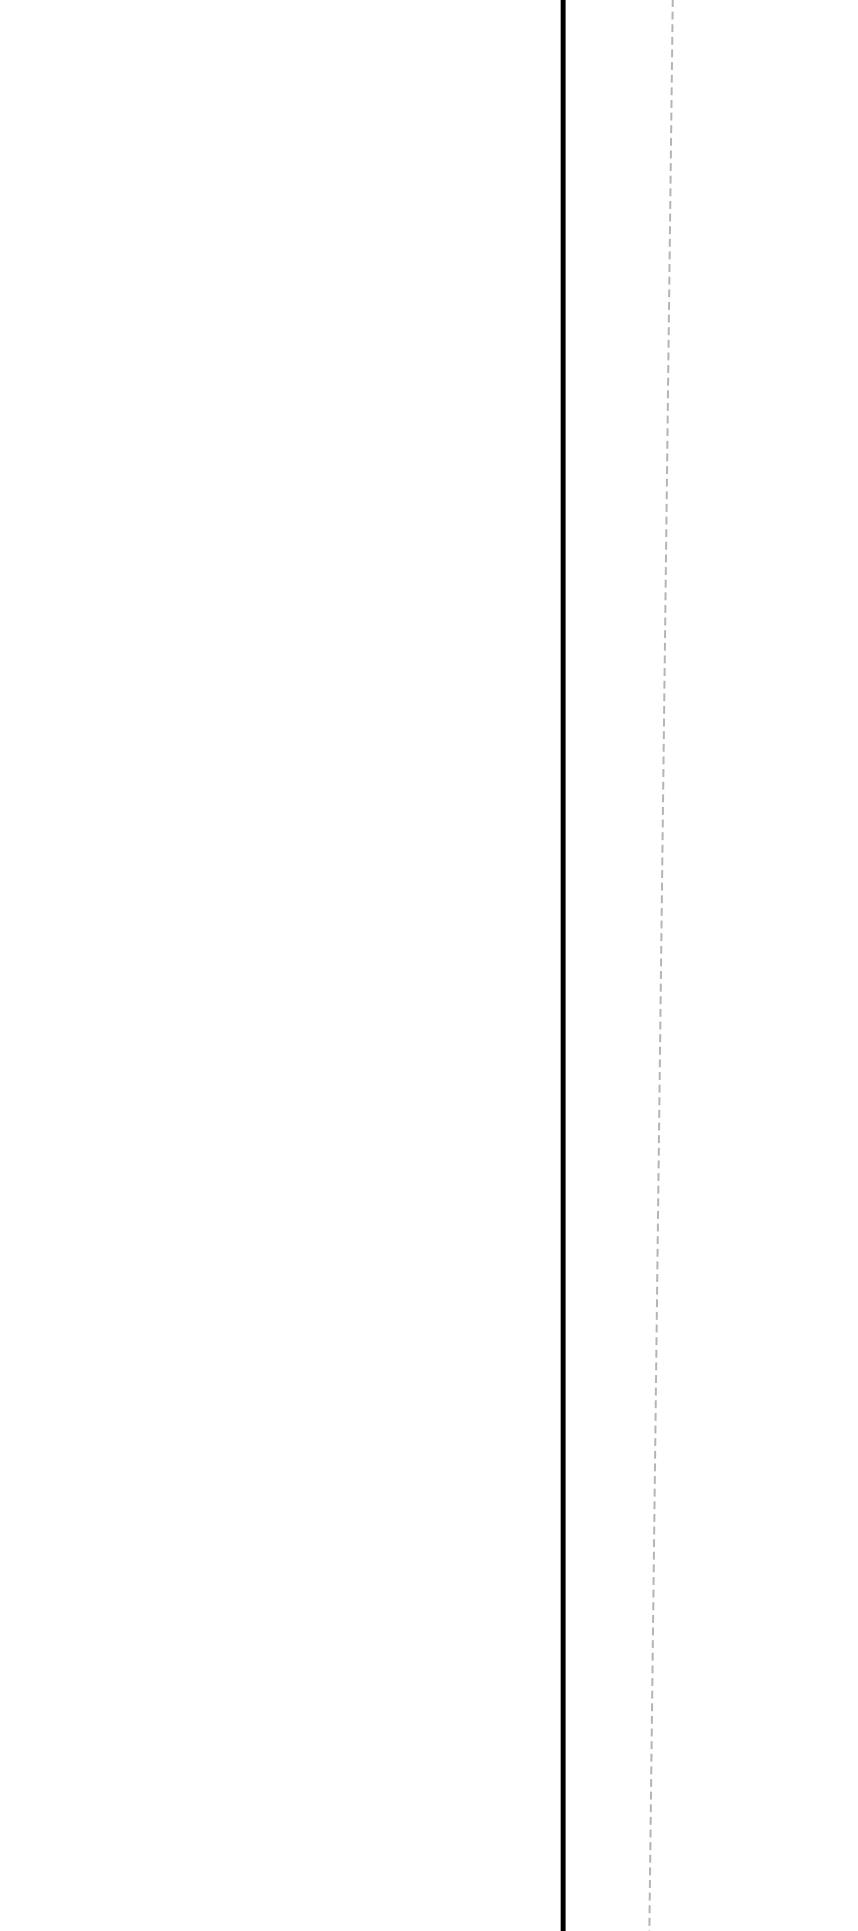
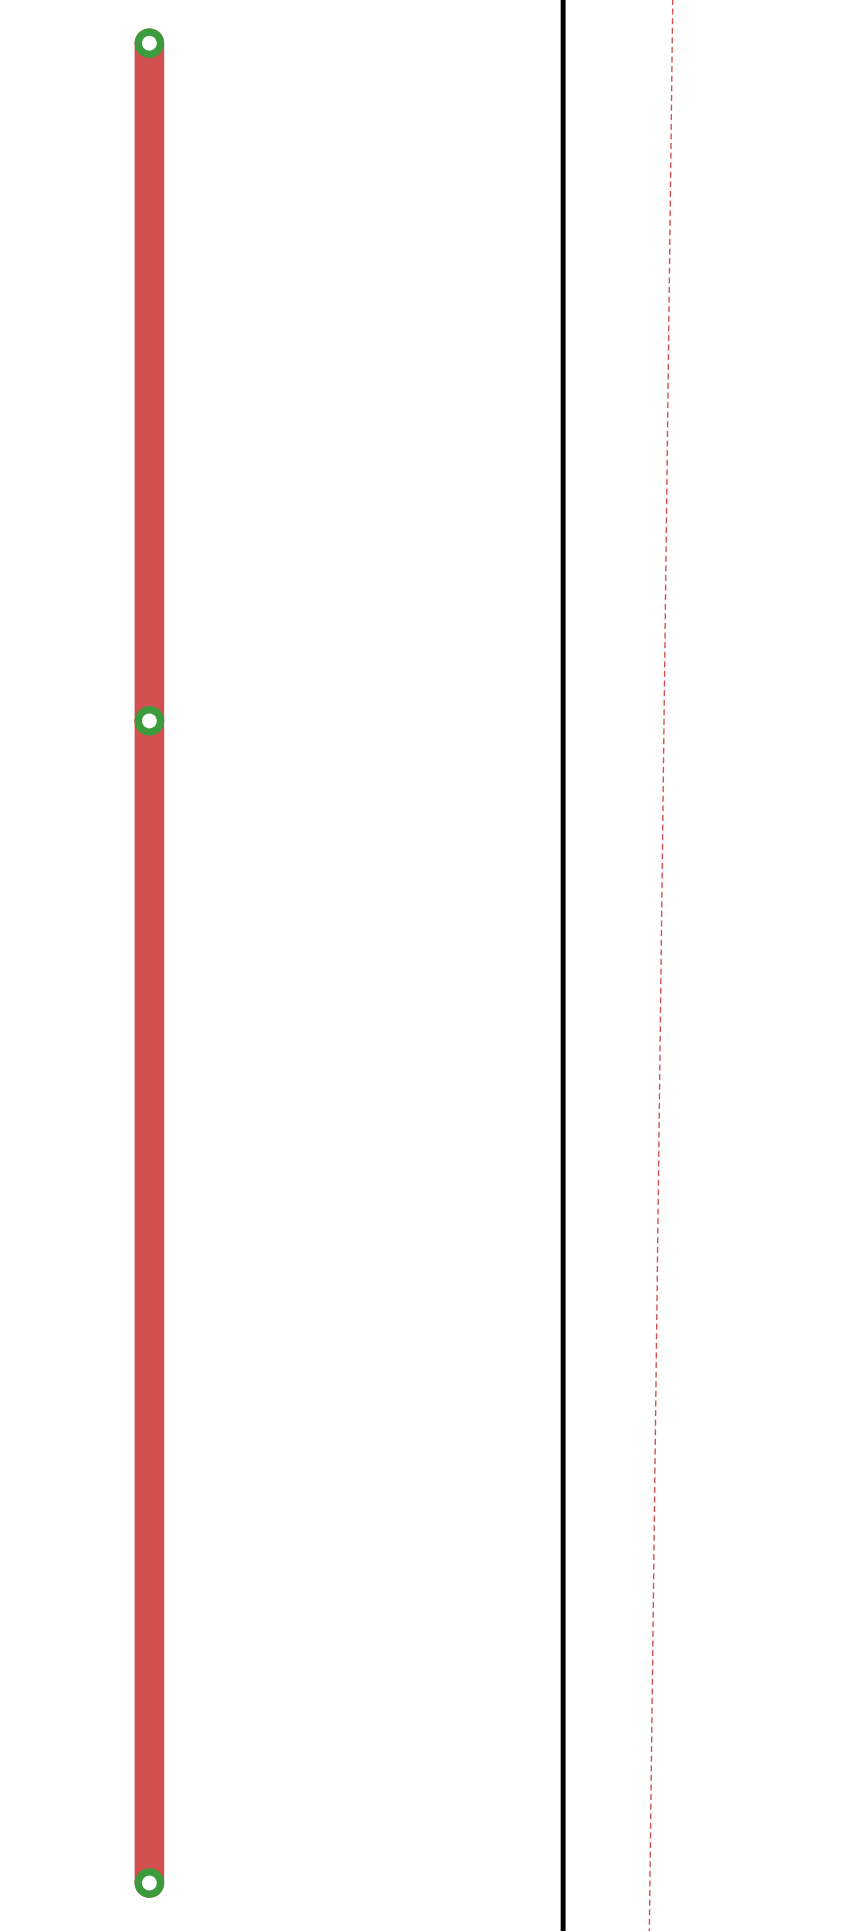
track: none -> (149, 43) (149, 1883)
via: none -> (149, 43)
via: none -> (149, 720)
via: none -> (149, 1883)

